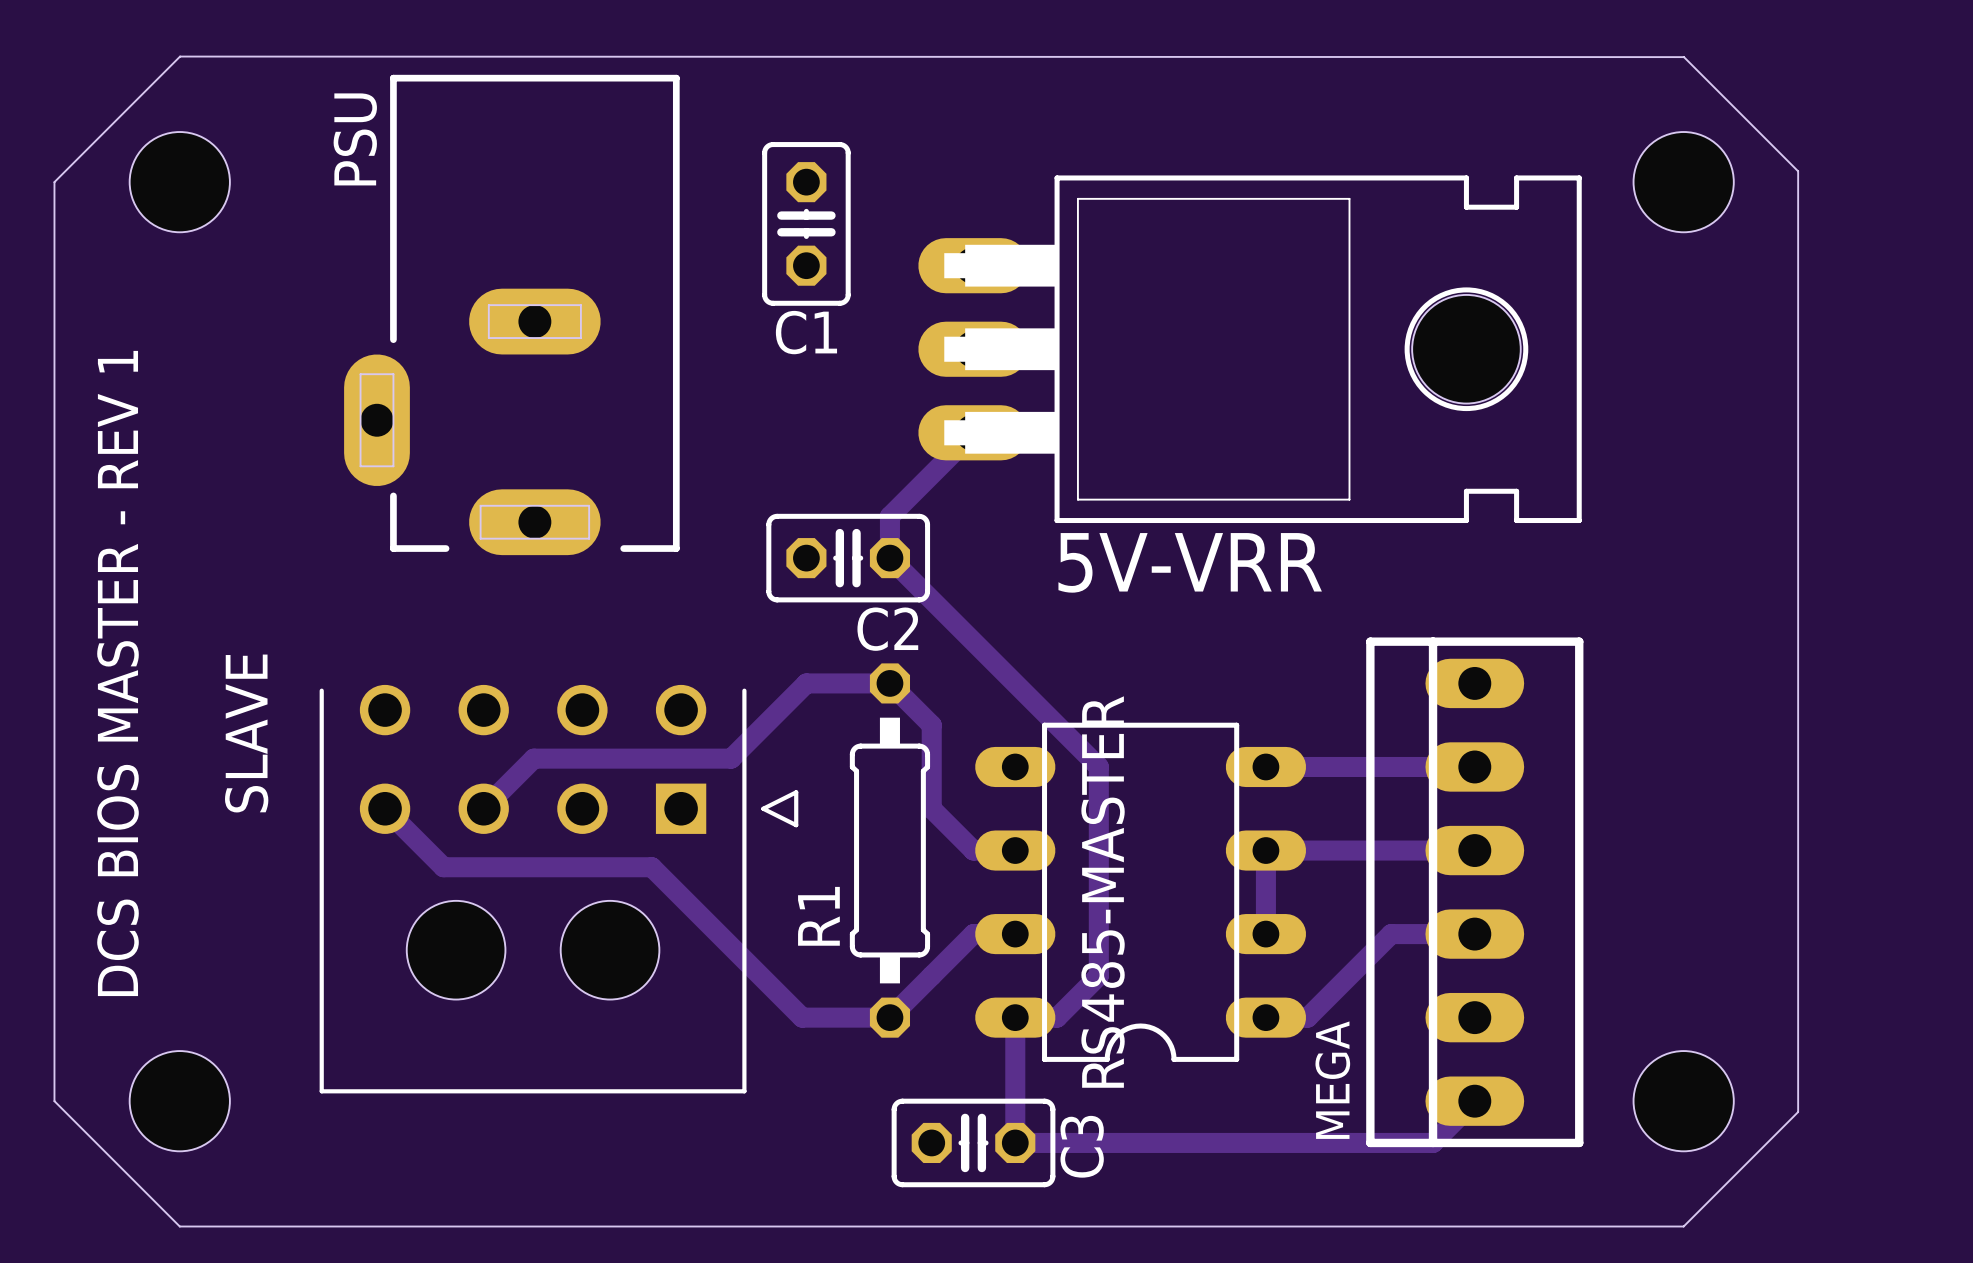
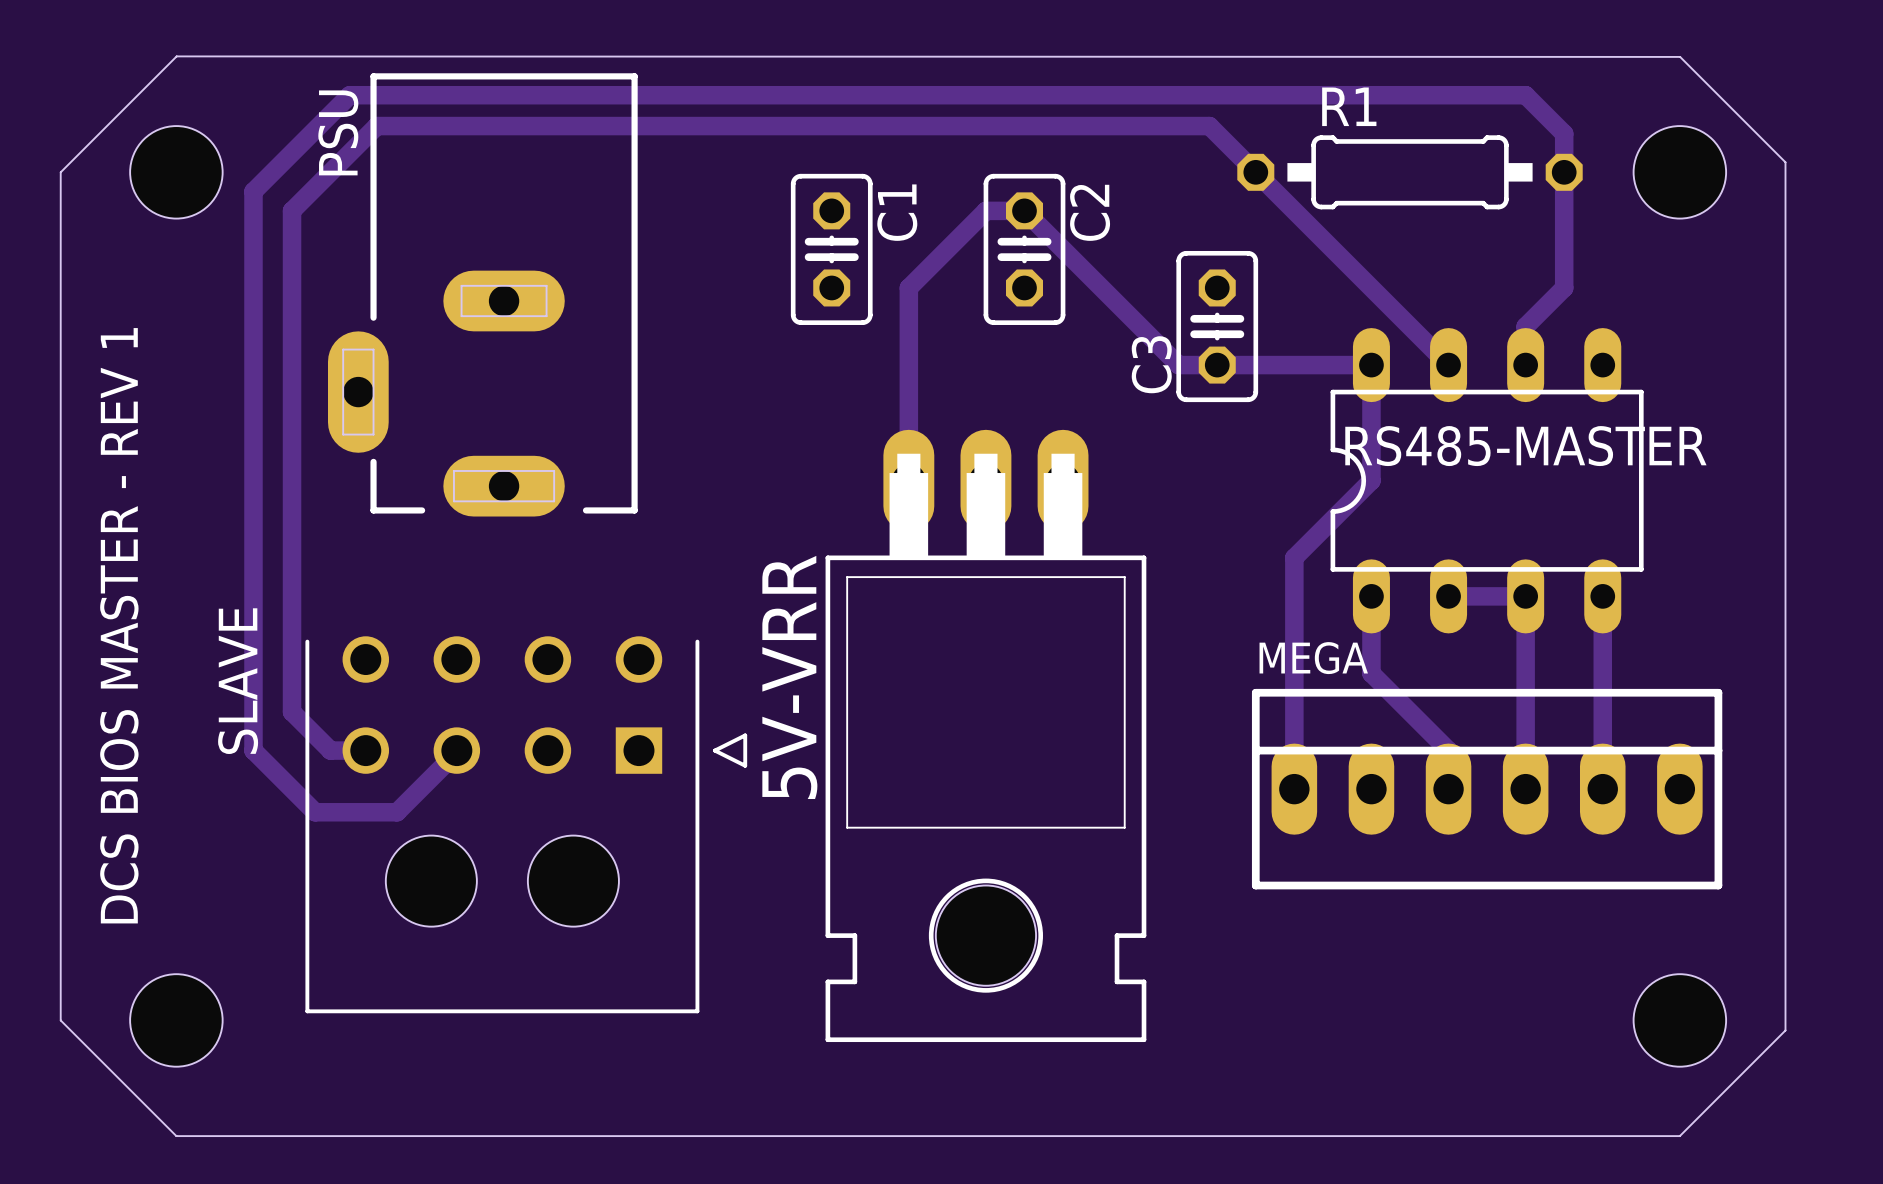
board edge: (1683, 57) (1798, 171) (1798, 1112) (1683, 1226) -> (1564, 56) (1680, 56) (1785, 162) (1785, 1030) (1679, 1136) (1564, 1136)
hole position: (1683, 182) -> (1679, 172)
C1 position: (806, 223) -> (831, 249)
C1 name rotation: 0° (806, 332) -> 90° counterclockwise (897, 212)
C1 name position: C1 (806, 332) -> C1 (897, 212)
5V-VRR rotation: 0° (1250, 349) -> 90° clockwise (985, 735)
5V-VRR position: (1250, 349) -> (985, 735)
track: (973, 432) (889, 516) (889, 558) (1098, 766) (1098, 975) (1057, 1017) (1015, 1017) (1015, 1142) (1433, 1142) (1474, 1101) -> none
track: none -> (908, 480) (908, 287) (985, 210) (1024, 210) (1178, 365) (1371, 365) (1371, 480) (1294, 557) (1294, 789)
C2 rotation: 0° (848, 558) -> 90° clockwise (1024, 249)
C2 position: (848, 558) -> (1024, 249)
C2 name position: C2 (887, 629) -> C2 (1090, 212)
track: none -> (1371, 596) (1371, 673) (1448, 750) (1448, 789)
track: none -> (1448, 596) (1525, 596) (1525, 789)
track: none -> (1602, 596) (1602, 789)
track: (1265, 766) (1474, 766) -> none
track: (385, 808) (443, 867) (651, 867) (802, 1017) (889, 1017) (973, 934) (1015, 934) -> (365, 750) (330, 750) (292, 712) (292, 210) (376, 126) (1209, 126) (1448, 365)
track: (483, 808) (533, 758) (731, 758) (806, 683) (889, 683) (931, 725) (931, 808) (973, 850) (1015, 850) -> (456, 750) (397, 812) (315, 812) (253, 750) (253, 191) (349, 95) (1525, 95) (1564, 133) (1564, 287) (1525, 326) (1525, 365)
R1 rotation: 0° (889, 850) -> 90° clockwise (1410, 172)
R1 position: (889, 850) -> (1410, 172)
track: (1474, 850) (1265, 850) (1265, 934) -> none
RS485-MASTER rotation: 0° (1140, 892) -> 90° clockwise (1487, 480)
RS485-MASTER position: (1140, 892) -> (1487, 480)
MEGA rotation: 0° (1474, 892) -> 90° clockwise (1487, 789)
track: (1474, 934) (1391, 934) (1307, 1017) (1265, 1017) -> none
hole position: (1683, 1101) -> (1679, 1020)
C3 rotation: 0° (973, 1142) -> 90° clockwise (1217, 326)
C3 position: (973, 1142) -> (1217, 326)
C3 name position: C3 (1082, 1146) -> C3 (1151, 364)

